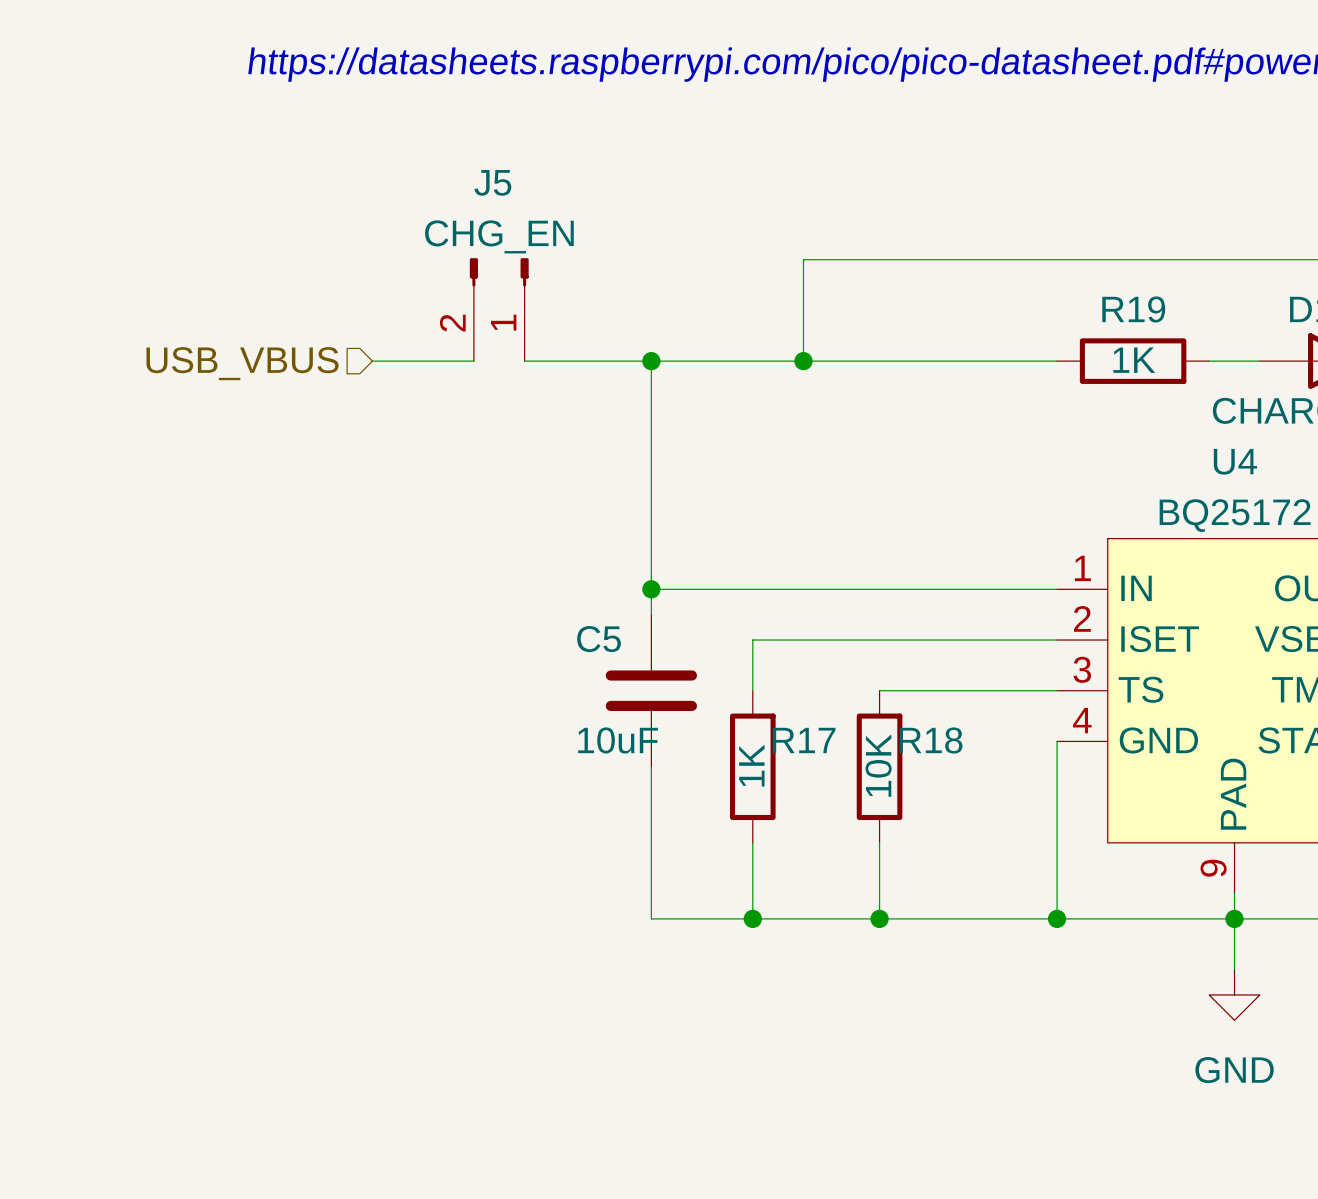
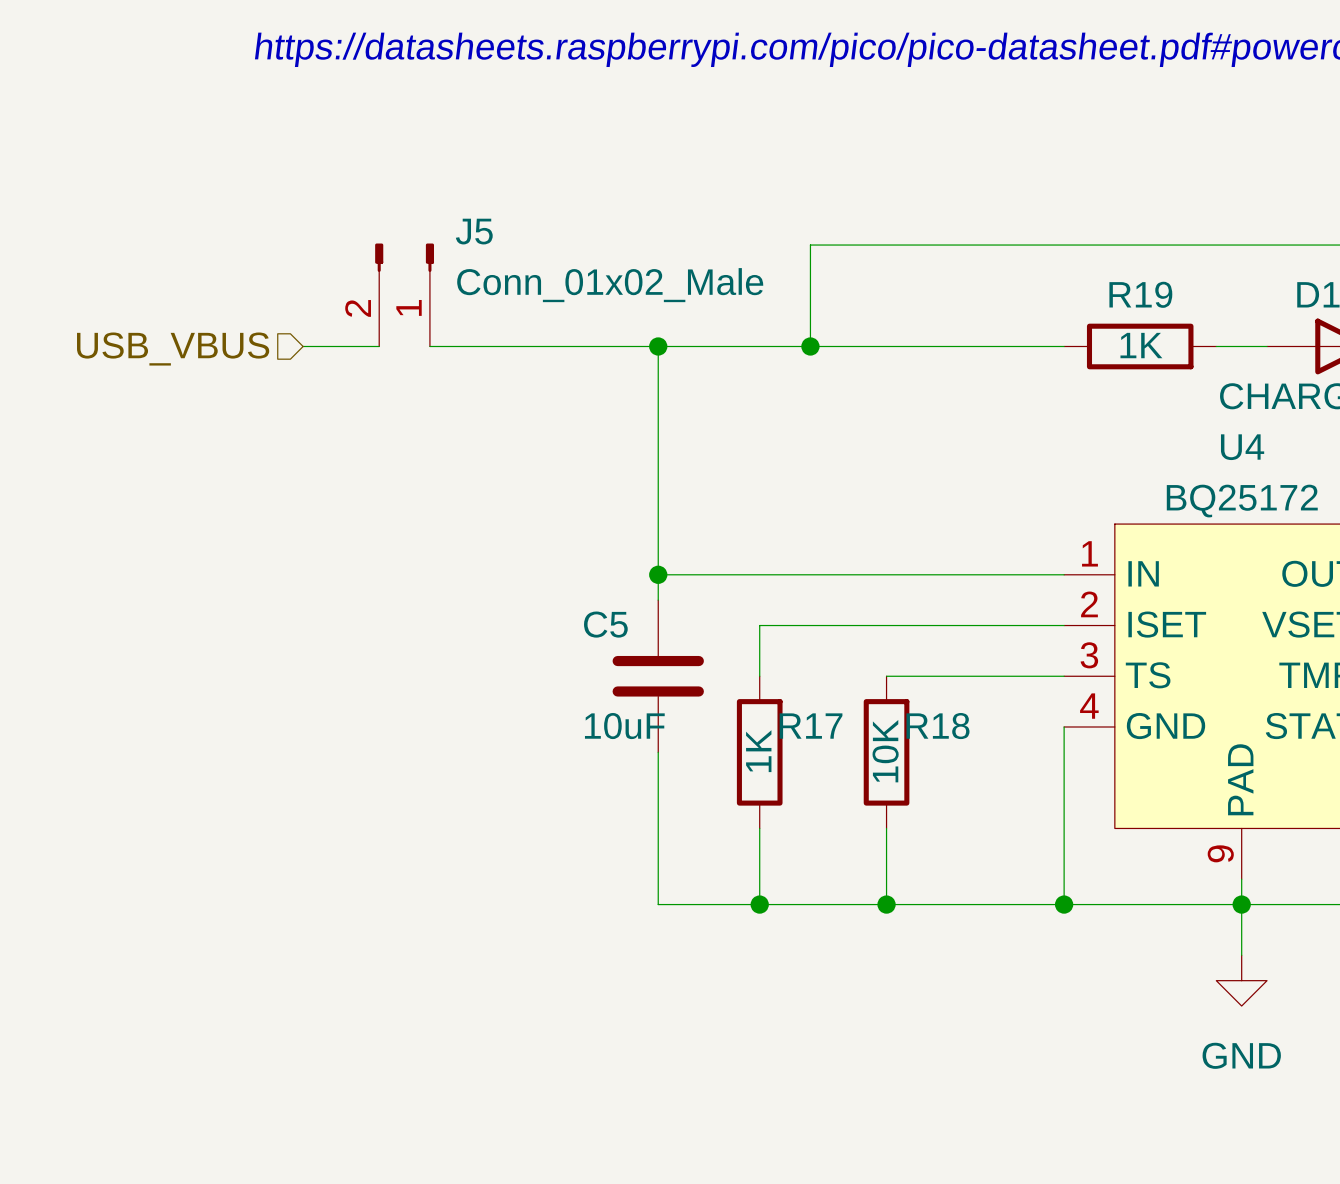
J5 name position: J5 (492, 182) -> J5 (474, 231)
J5 value: CHG_EN (499, 236) -> Conn_01x02_Male (610, 285)
J5 position: (499, 309) -> (404, 295)
wire: (372, 361) (423, 361) -> (379, 346) (303, 346)
wire: none -> (480, 346) (531, 346)
hierarchical label position: USB_VBUS (242, 363) -> USB_VBUS (173, 349)

